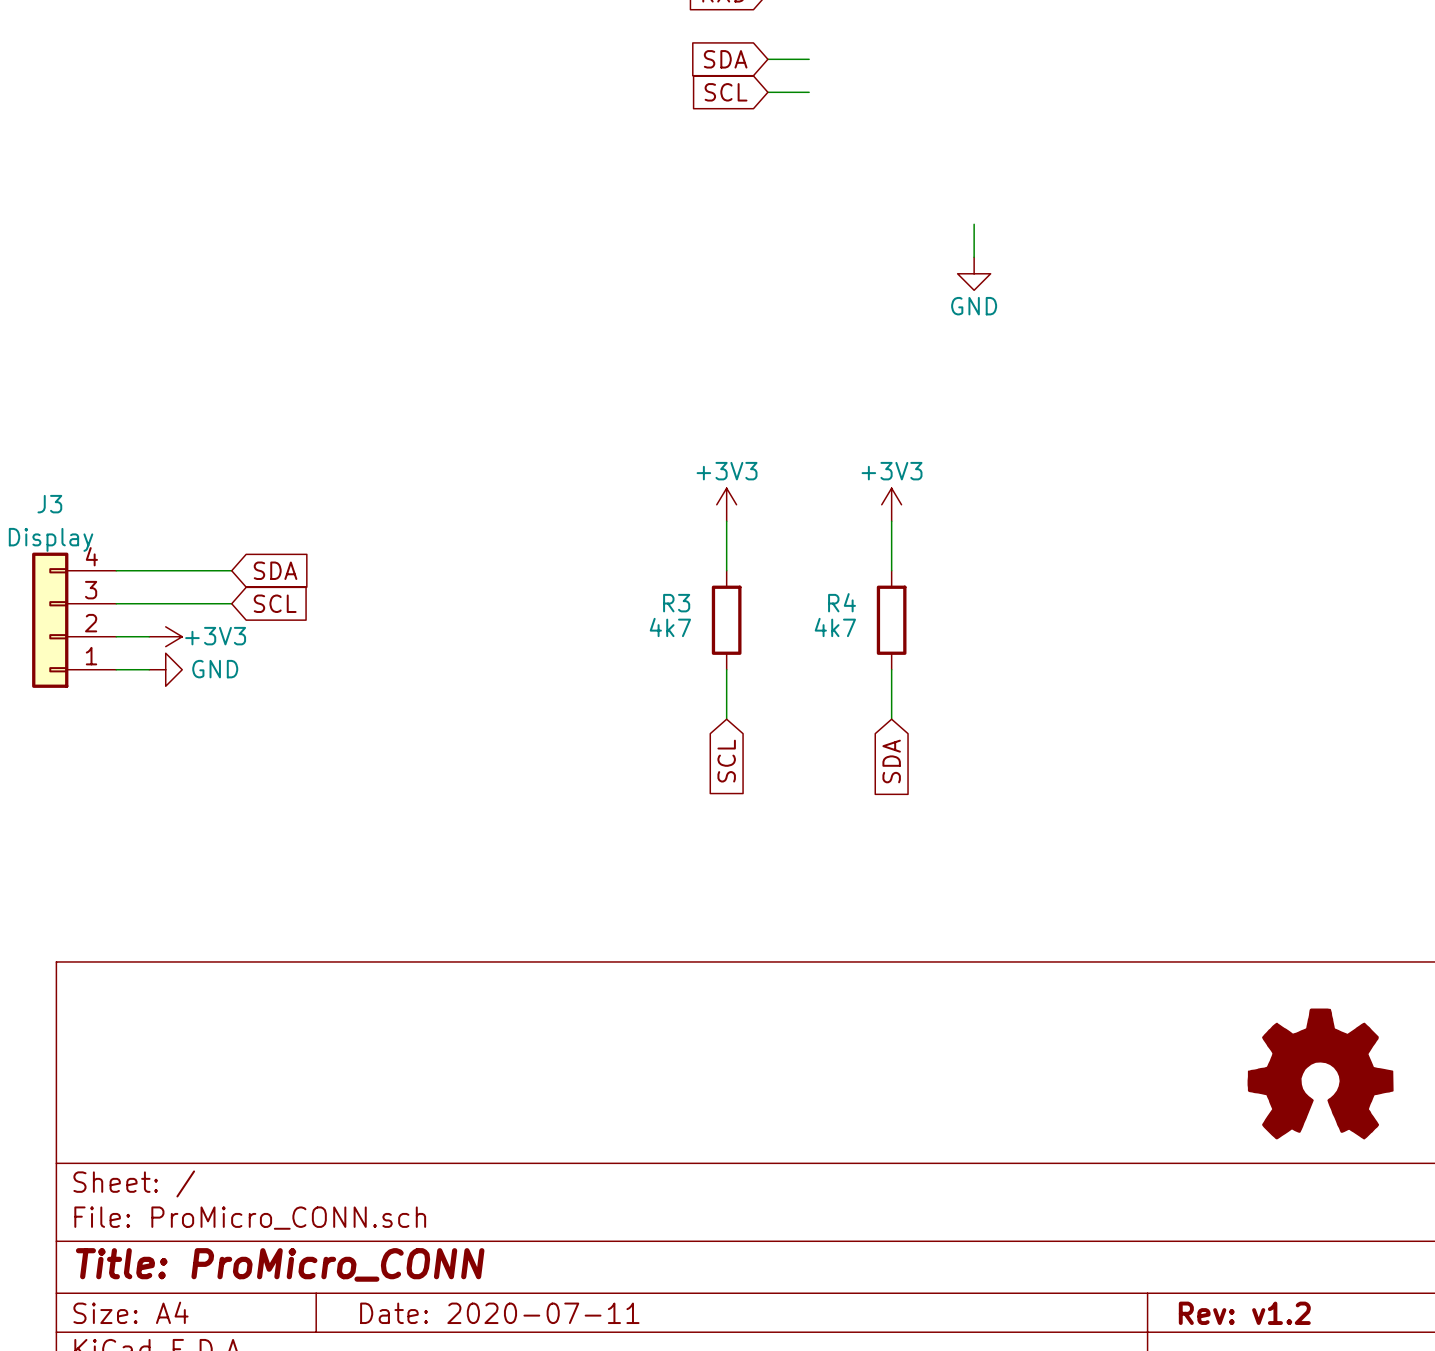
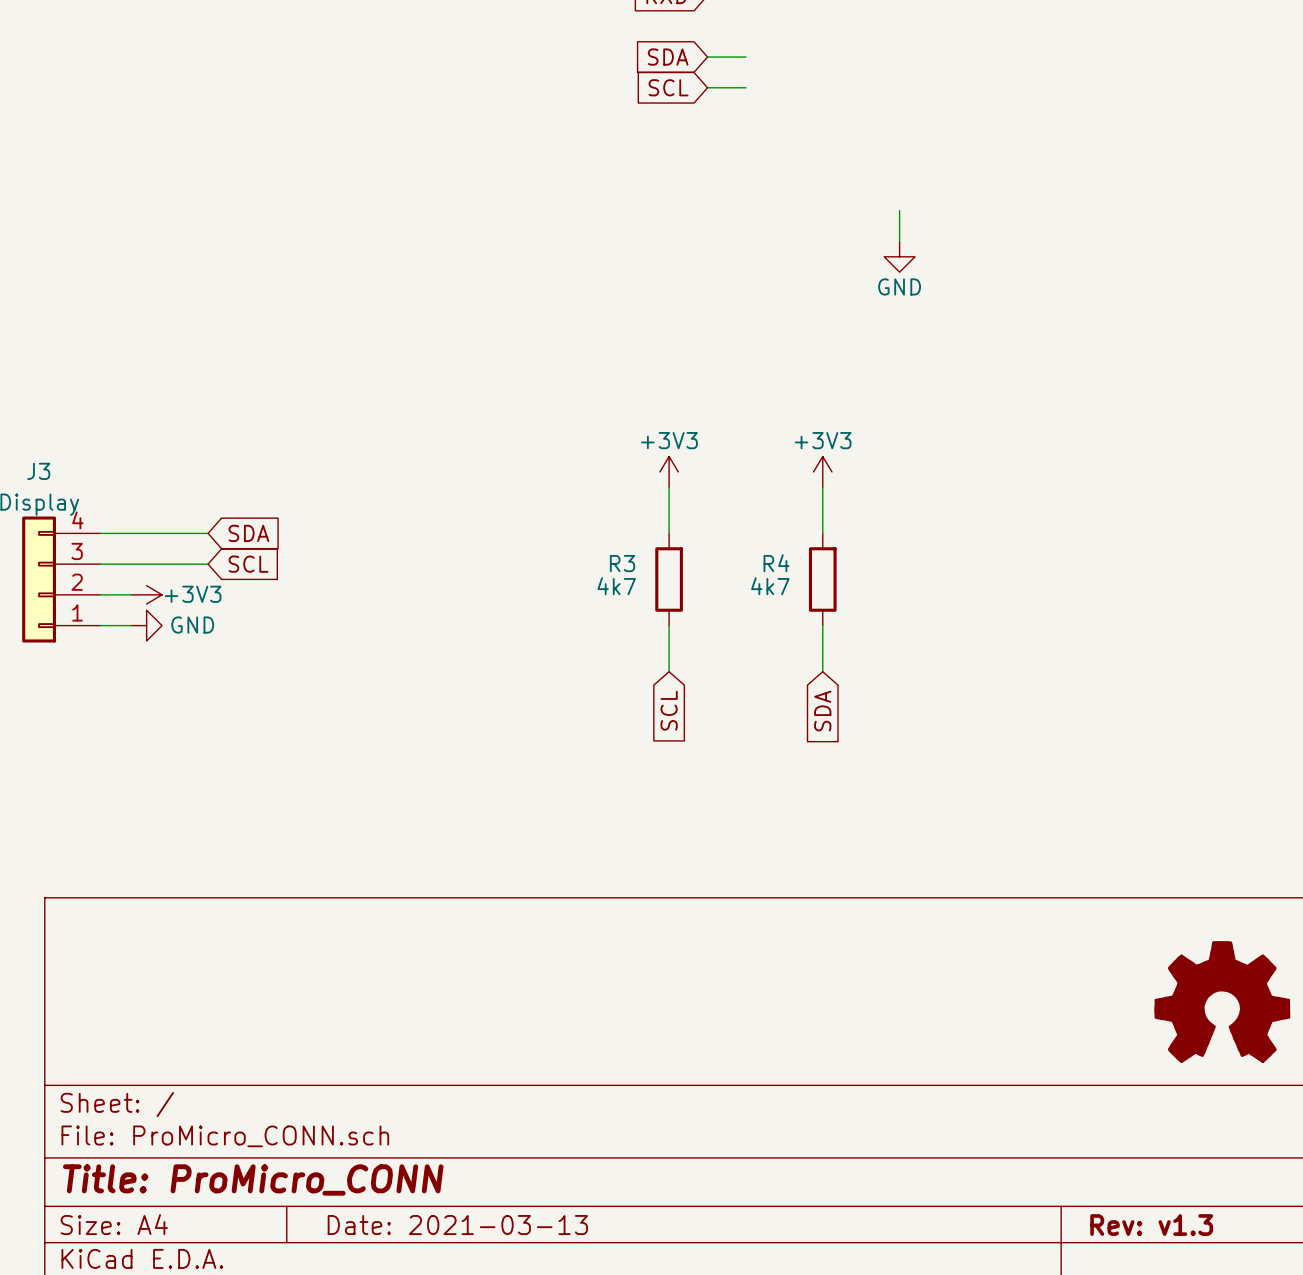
title block: Date: 2020-07-11 (499, 1313) -> Date: 2021-03-13 (457, 1225)
title block: Rev: v1.2 (1244, 1313) -> Rev: v1.3 (1151, 1225)

